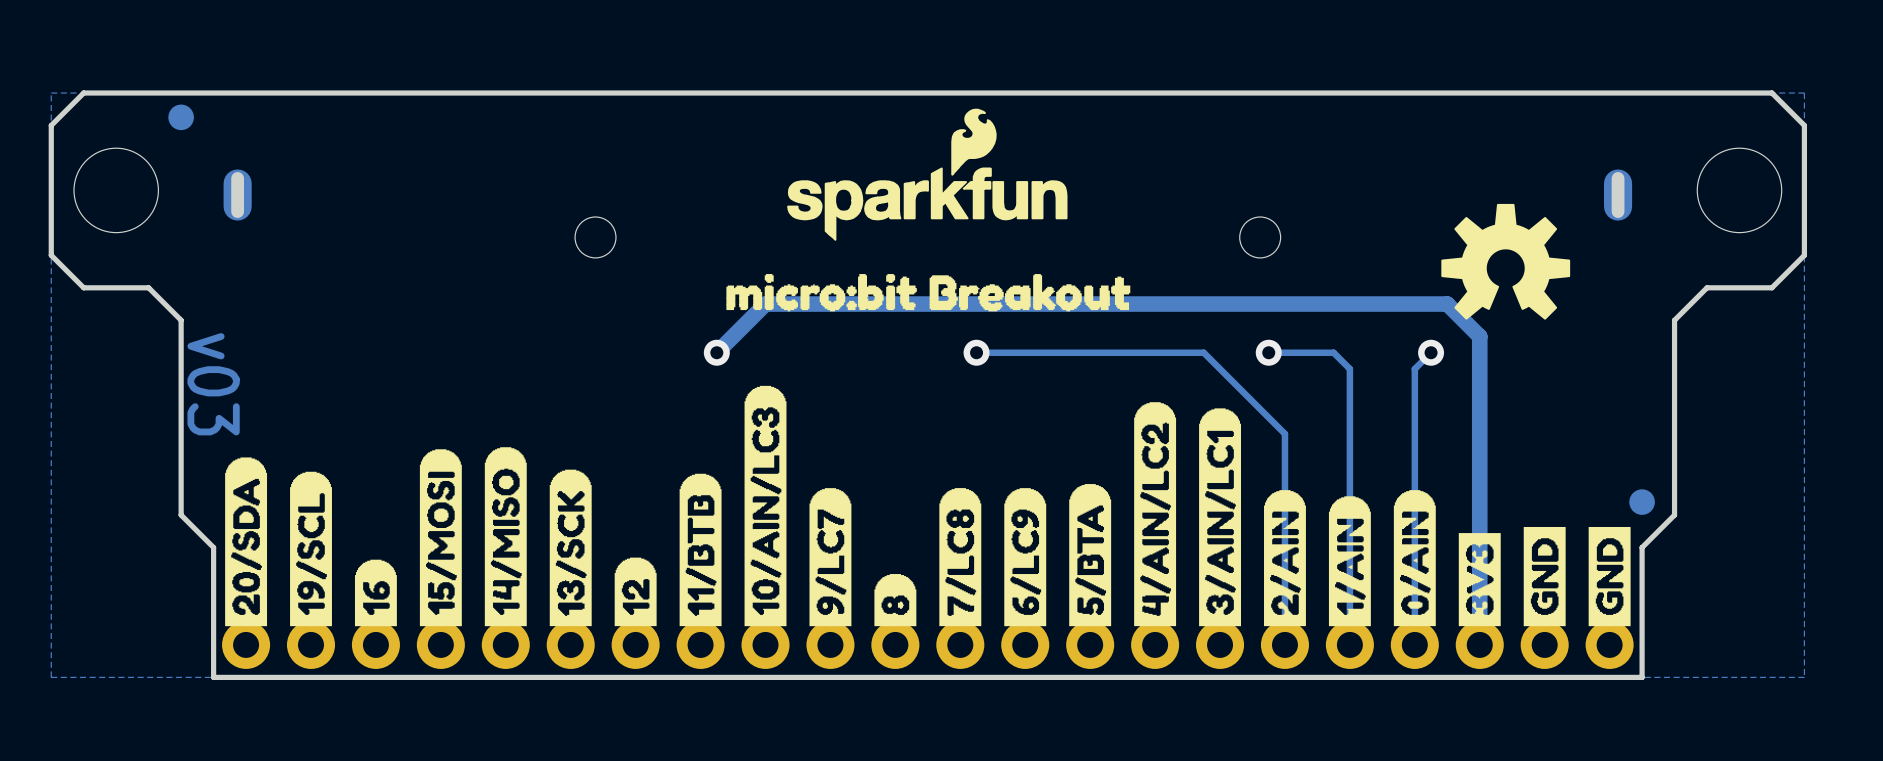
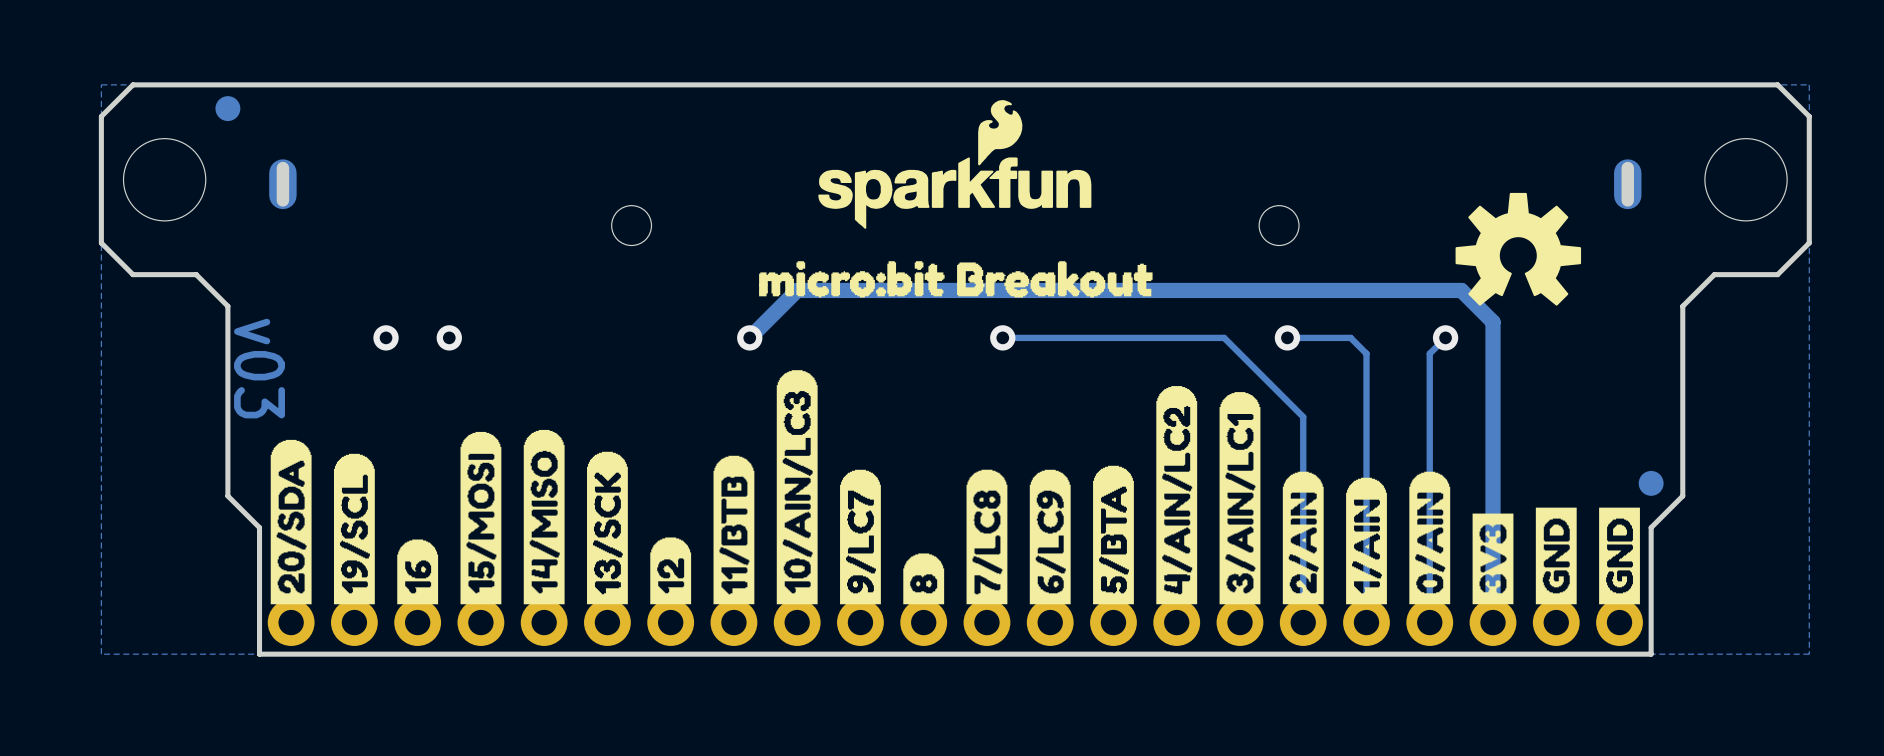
via: none -> (386, 337)
via: none -> (449, 337)

